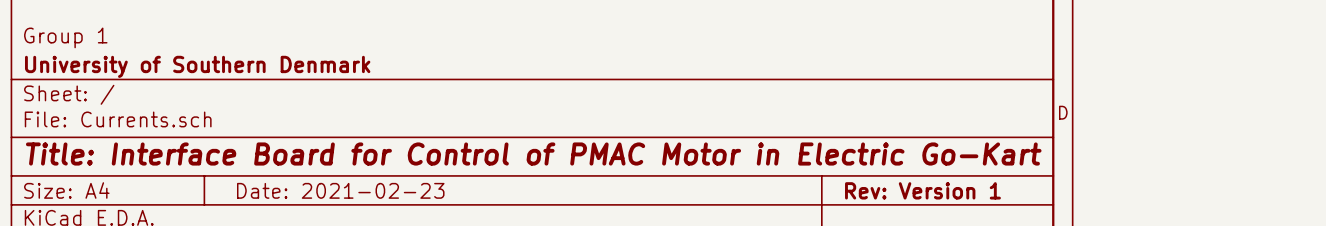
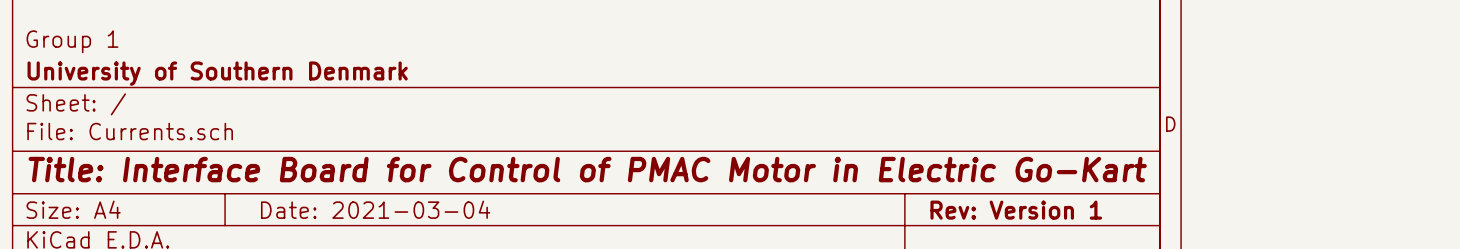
title block: Date: 2021-02-23 (340, 190) -> Date: 2021-03-04 (375, 209)

